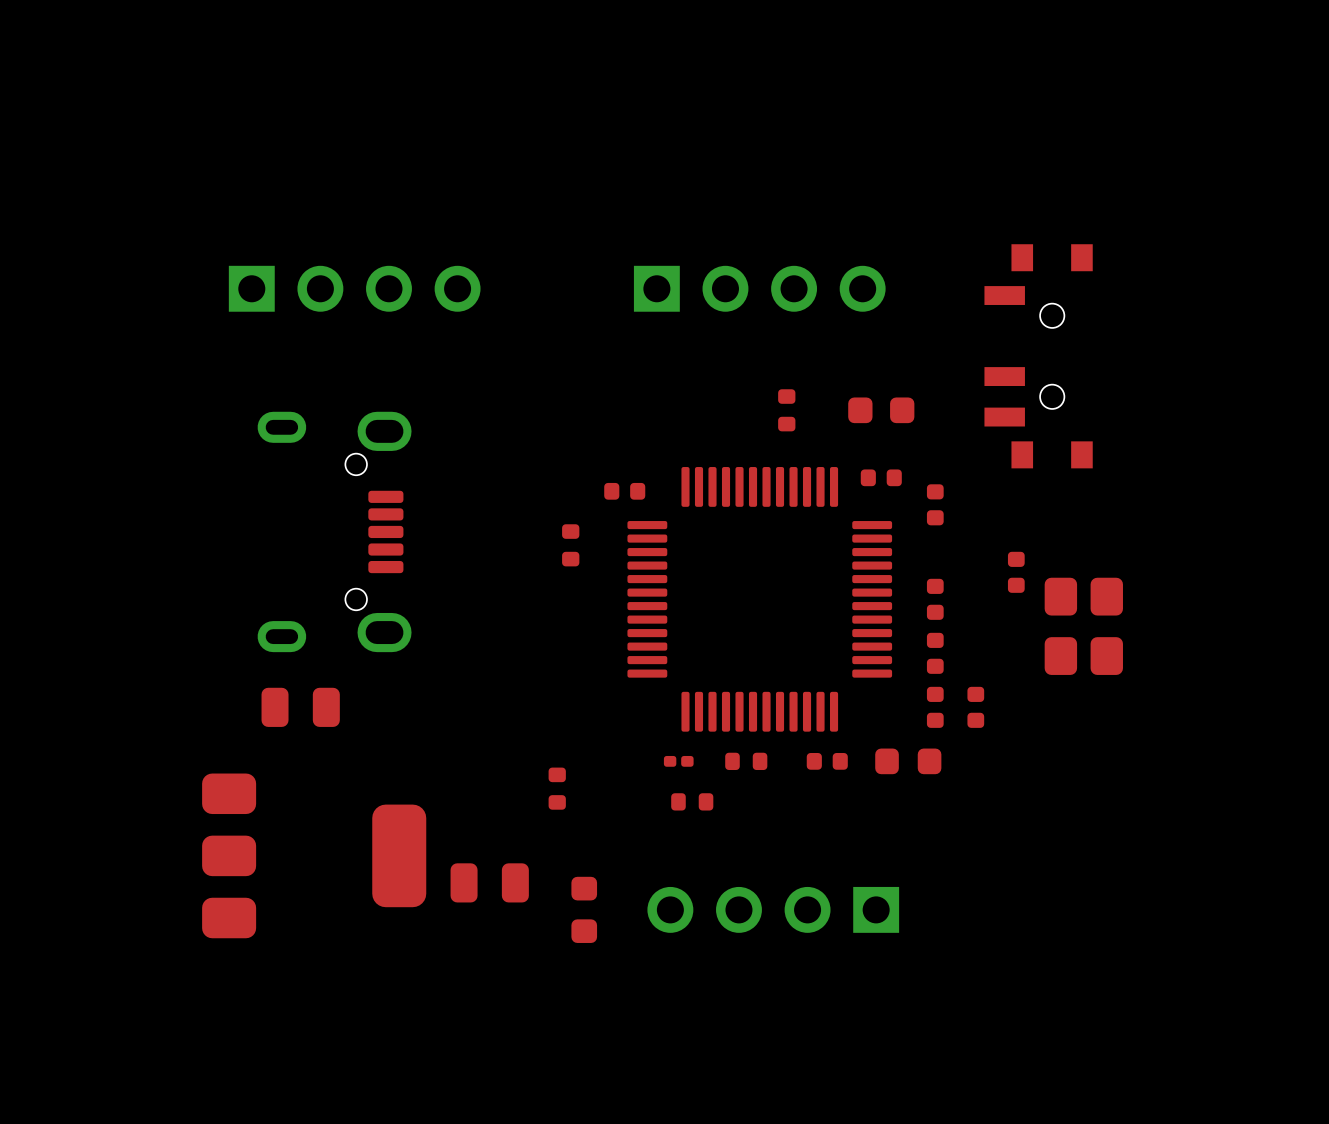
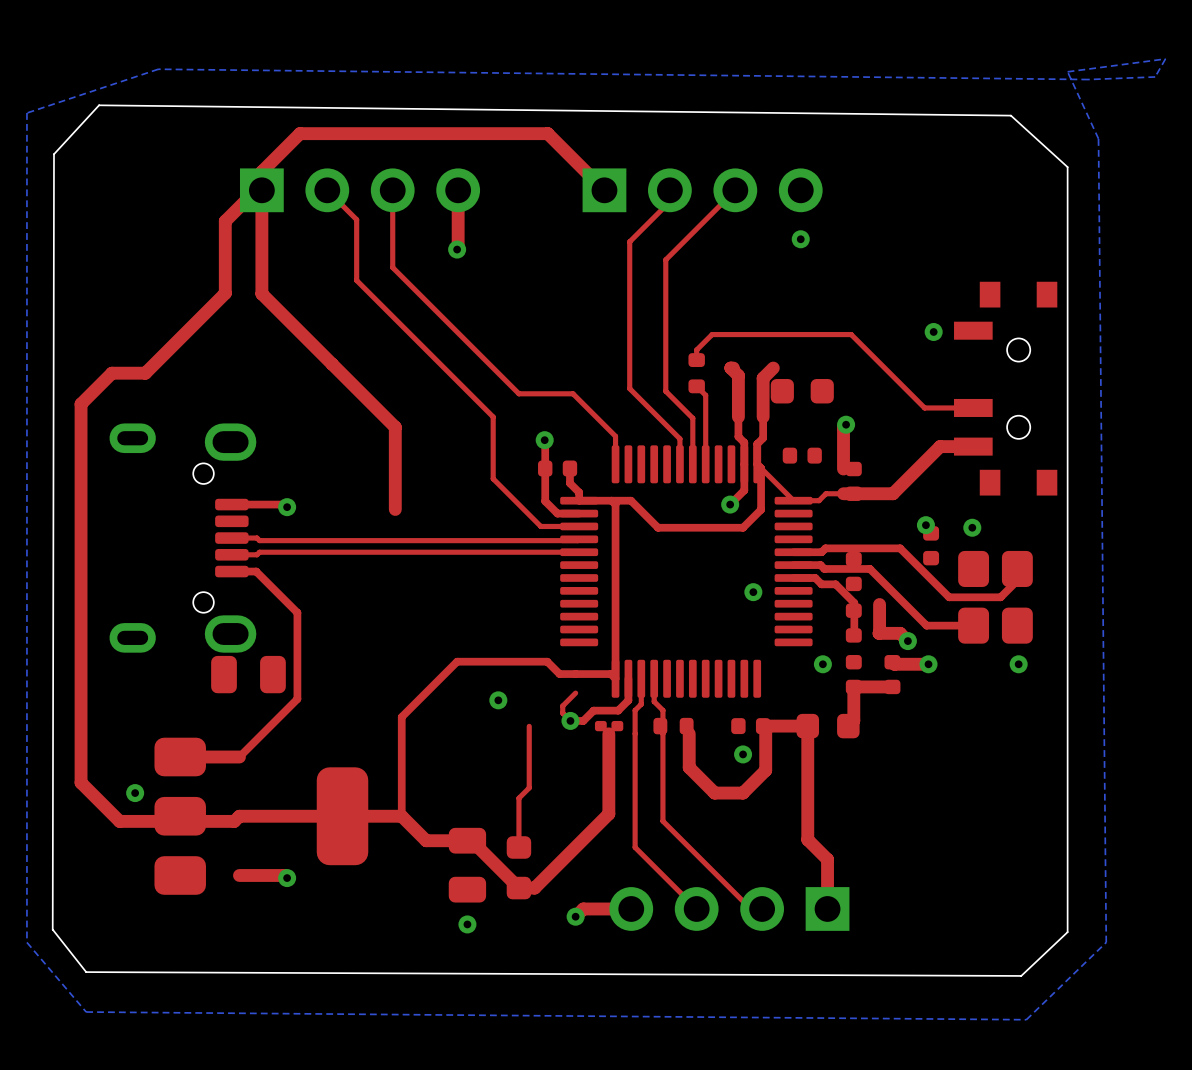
bottom zone outline: none -> (1165, 58) (1067, 71) (1098, 138) (1106, 942) (1026, 1019) (86, 1012) (26, 942) (26, 113) (158, 69) (1088, 79) (1155, 76) (1165, 58)
board edge: none -> (99, 105) (1010, 115) (1067, 167) (1067, 932) (1021, 975) (86, 972) (52, 929) (54, 154) (99, 105)
top track: none -> (261, 190) (256, 190) (225, 221) (225, 293) (145, 373) (111, 373) (81, 404) (81, 782) (119, 821) (234, 821) (239, 816) (401, 816)
top track: none -> (327, 190) (356, 219) (356, 280) (493, 416) (493, 478) (540, 526) (579, 526)
top track: none -> (392, 190) (392, 267) (518, 393) (573, 393) (615, 436) (615, 464)
top track: none -> (458, 190) (457, 249)
top track: none -> (604, 190) (547, 133) (300, 133) (261, 171) (261, 293) (395, 427) (395, 509)
top track: none -> (669, 190) (669, 201) (629, 241) (629, 388) (679, 438) (679, 464)
top track: none -> (735, 190) (665, 259) (665, 391) (692, 418) (692, 464)
via: none -> (800, 239)
via: none -> (457, 249)
part position: (354, 288) -> (360, 190)
part position: (759, 288) -> (702, 190)
via: none -> (933, 331)
part position: (1038, 356) -> (1005, 388)
top track: none -> (696, 360) (696, 350) (712, 334) (851, 334) (924, 407) (973, 407)
top track: none -> (733, 368) (730, 368) (738, 375) (738, 436) (744, 442) (744, 490) (730, 504)
top track: none -> (773, 368) (763, 378) (763, 438) (757, 444) (757, 464)
top track: none -> (696, 386) (705, 395) (705, 464)
part position: (786, 410) -> (696, 373)
top track: none -> (846, 424) (843, 427) (843, 469)
via: none -> (846, 424)
top track: none -> (544, 440) (545, 501) (557, 513) (579, 513)
via: none -> (544, 440)
top track: none -> (973, 446) (940, 446) (892, 493) (825, 493) (819, 500) (793, 500) (757, 464)
top track: none -> (757, 464) (761, 468) (761, 509) (743, 527) (658, 527) (631, 500) (579, 500) (579, 492) (569, 483) (569, 468)
top track: none -> (611, 500) (615, 504) (615, 678) (610, 674) (559, 674) (547, 661) (457, 661) (401, 717) (401, 816)
top track: none -> (231, 504) (284, 504) (287, 507)
via: none -> (730, 504)
part position: (334, 531) -> (182, 538)
via: none -> (287, 507)
part: (570, 545) -> none
via: none -> (925, 525)
via: none -> (972, 527)
top track: none -> (231, 538) (256, 538) (259, 540) (579, 539)
top track: none -> (579, 552) (259, 552) (256, 554) (231, 554)
top track: none -> (793, 552) (821, 552) (825, 548) (900, 548) (949, 597) (1000, 597) (1017, 580) (1017, 557)
top track: none -> (793, 565) (820, 565) (824, 568) (869, 568) (926, 625) (973, 625)
top track: none -> (231, 571) (256, 571) (297, 612) (297, 699) (239, 757) (172, 757)
top track: none -> (793, 577) (815, 577) (821, 584) (835, 584) (854, 602) (854, 633)
via: none -> (753, 592)
top track: none -> (879, 604) (879, 633) (900, 633) (907, 641)
via: none -> (907, 641)
top track: none -> (892, 662) (894, 664) (928, 664)
via: none -> (822, 664)
via: none -> (928, 664)
via: none -> (1018, 664)
top track: none -> (628, 678) (628, 700) (618, 710) (593, 710) (583, 720) (570, 720) (562, 713) (562, 706) (575, 693)
top track: none -> (641, 678) (641, 704) (635, 710) (635, 847) (696, 908)
top track: none -> (654, 678) (654, 701) (662, 710) (662, 821) (750, 908) (762, 908)
top track: none -> (892, 686) (853, 686) (853, 720) (848, 726)
via: none -> (498, 700)
via: none -> (570, 720)
top track: none -> (529, 726) (529, 787) (518, 798) (518, 847)
top track: none -> (608, 733) (608, 813) (534, 888) (518, 888) (471, 840) (426, 840) (401, 816)
top track: none -> (689, 733) (689, 767) (714, 793) (743, 793) (765, 770) (765, 726) (807, 726) (807, 839) (827, 859) (827, 908)
part: (557, 788) -> none
via: none -> (743, 754)
part: (692, 801) -> none
via: none -> (135, 793)
part rotation: 0° (489, 882) -> 90° clockwise (467, 865)
part position: (489, 882) -> (467, 865)
part position: (773, 909) -> (729, 908)
top track: none -> (239, 875) (284, 875) (287, 878)
via: none -> (287, 878)
top track: none -> (631, 908) (583, 908) (575, 916)
via: none -> (575, 916)
via: none -> (467, 924)

